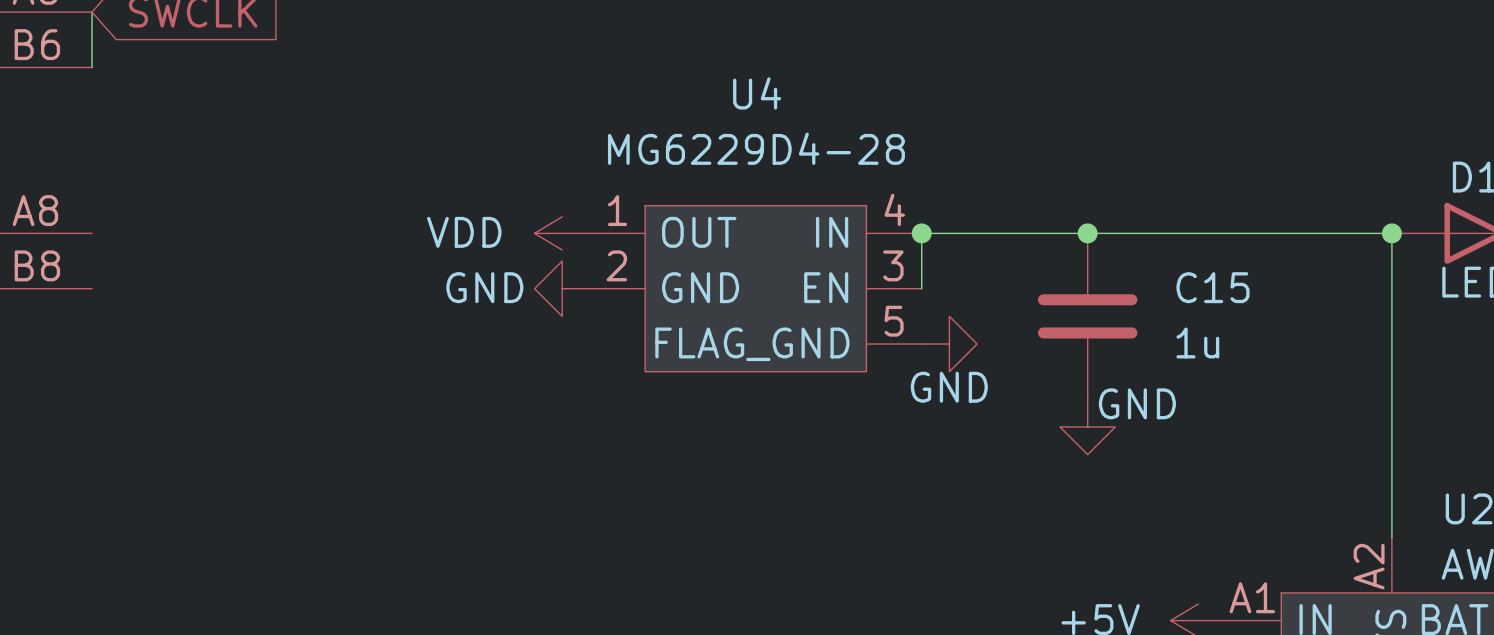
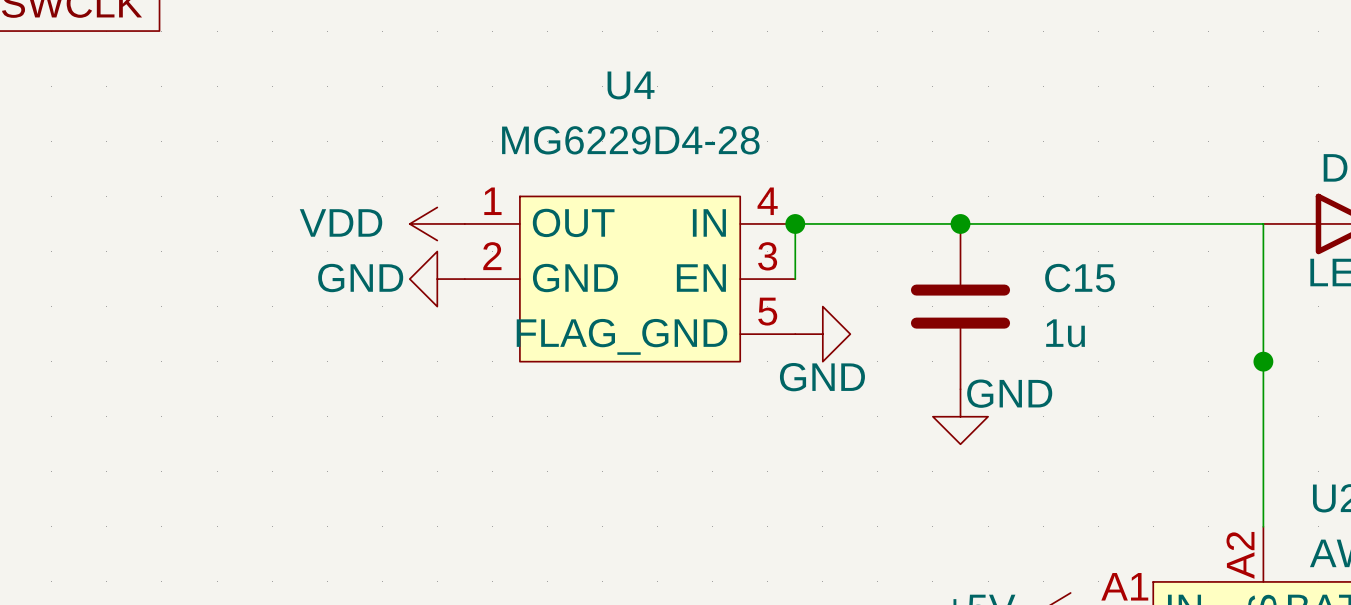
junction: (1391, 233) -> none
junction: none -> (1263, 361)

